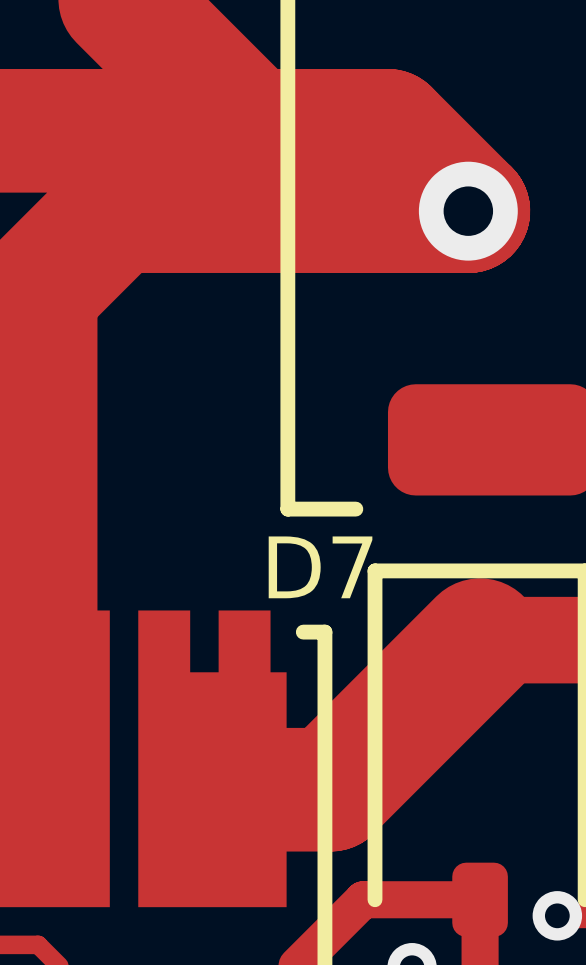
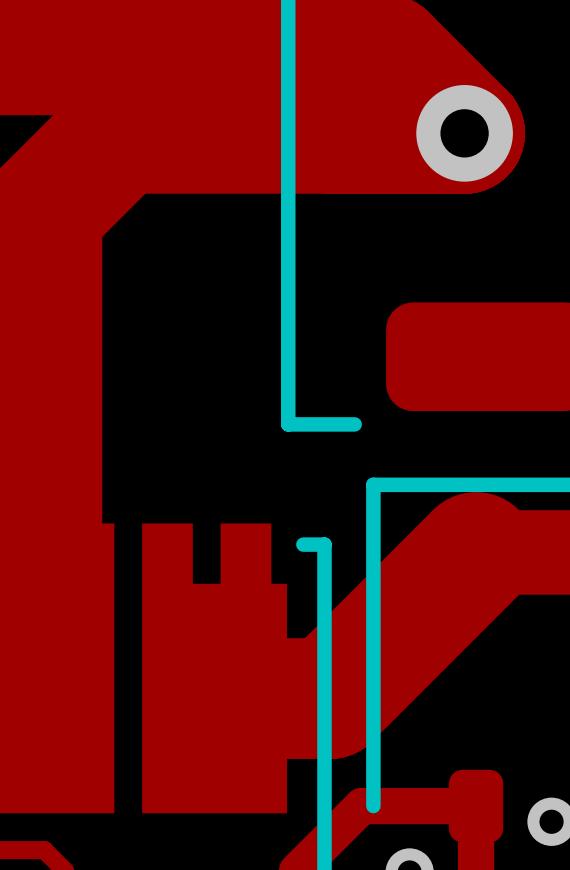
D7 name: D7 (320, 567) -> none

